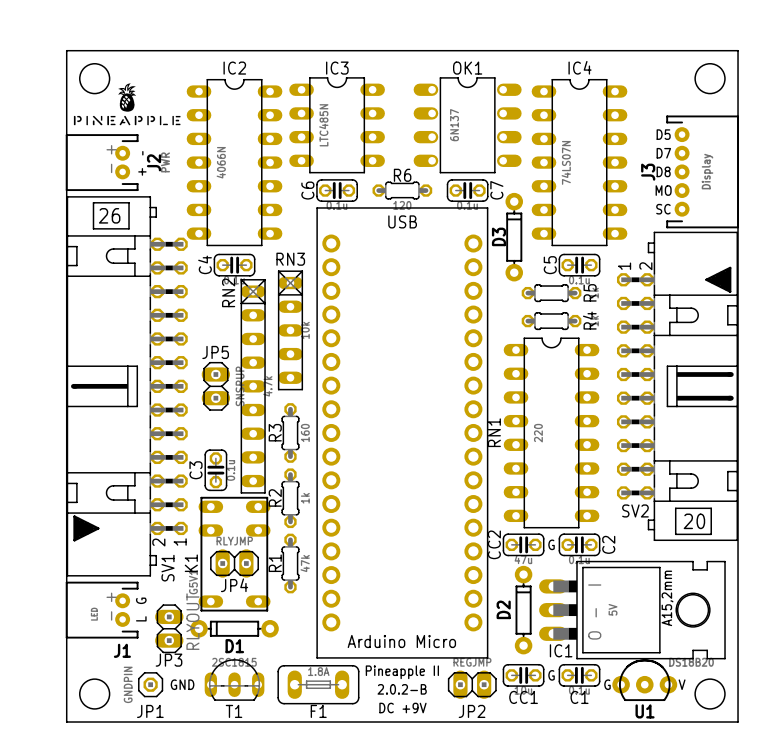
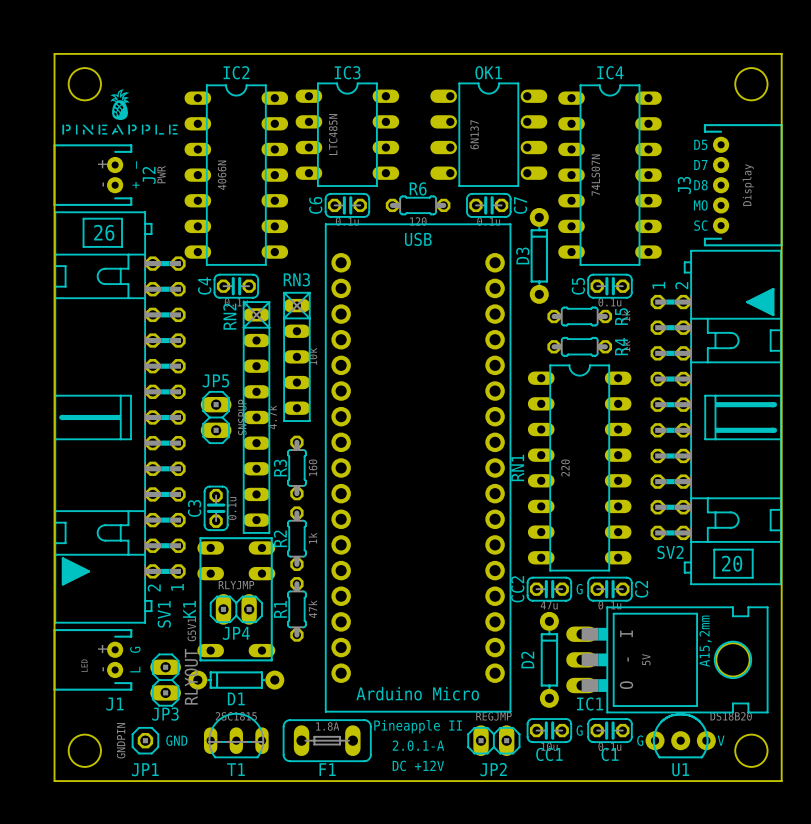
text: 2.0.2-B (402, 689) -> 2.0.1-A (418, 745)
text: DC +9V (402, 708) -> DC +12V (418, 765)

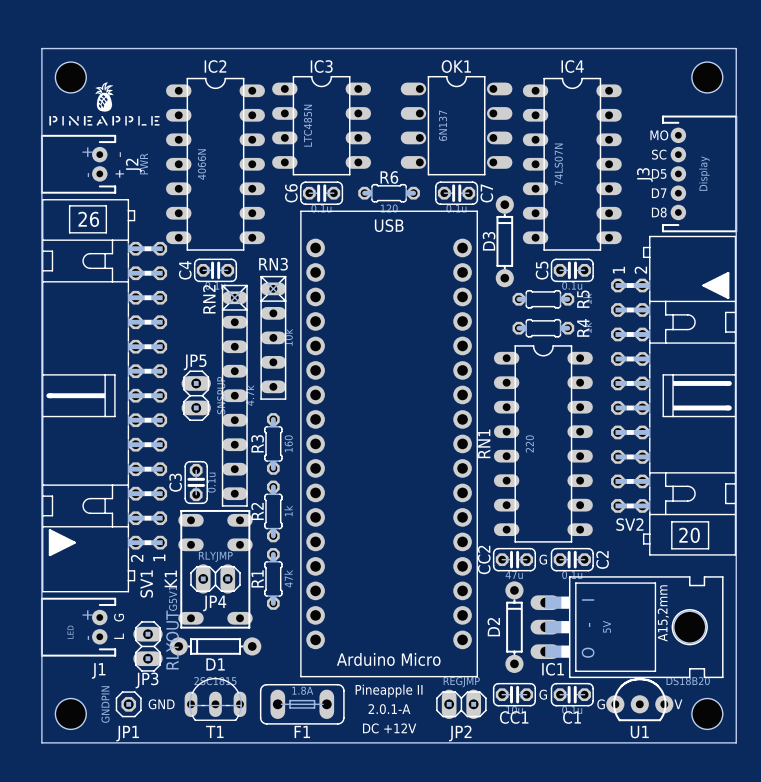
text: D5 (700, 144) -> MO (659, 135)
text: D7 (700, 165) -> SC (659, 154)
text: D8 (700, 185) -> D5 (659, 174)
text: MO (700, 205) -> D7 (659, 193)
text: SC (700, 225) -> D8 (659, 212)

